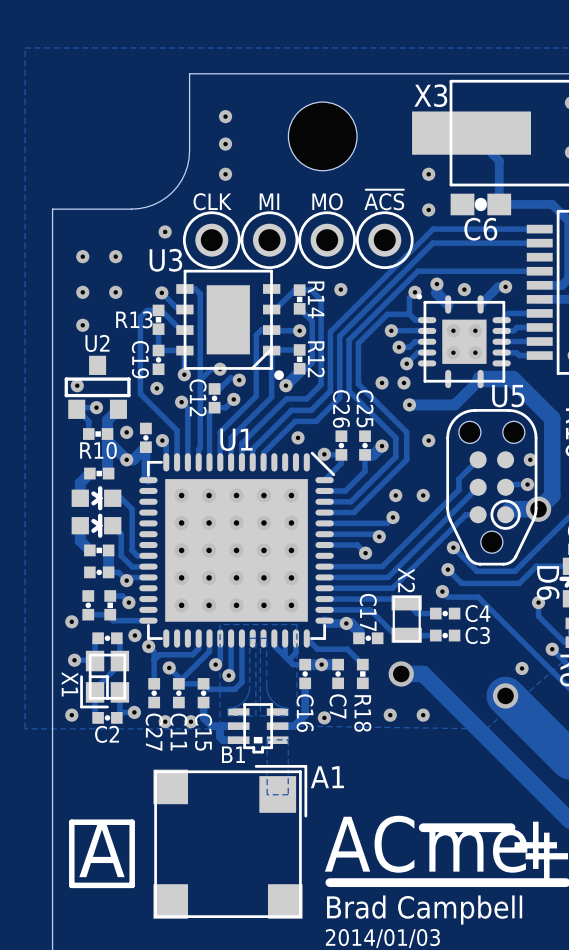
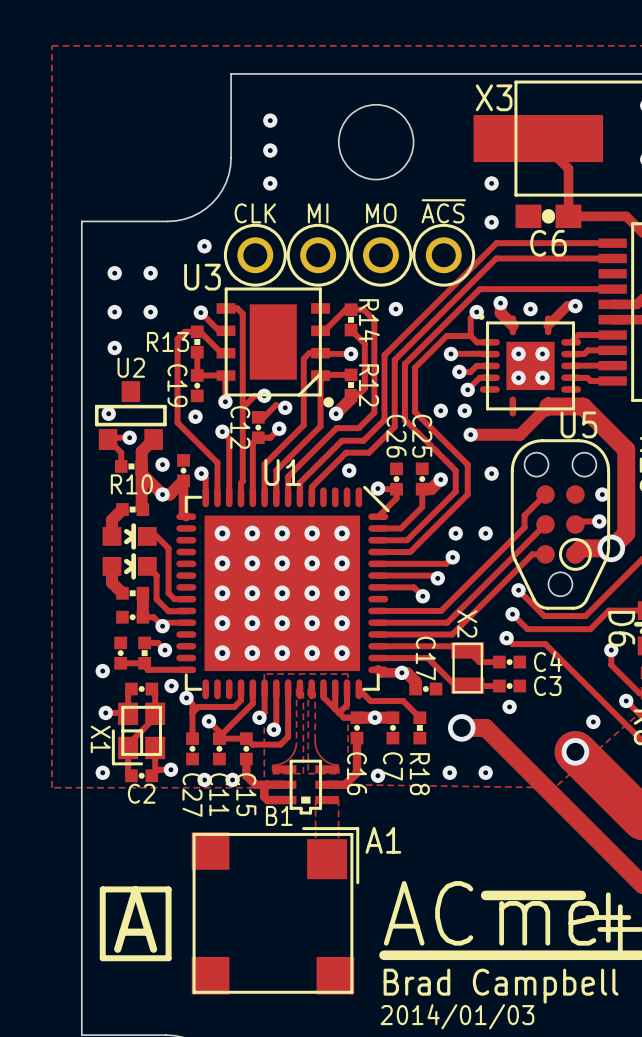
via: none -> (509, 706)

